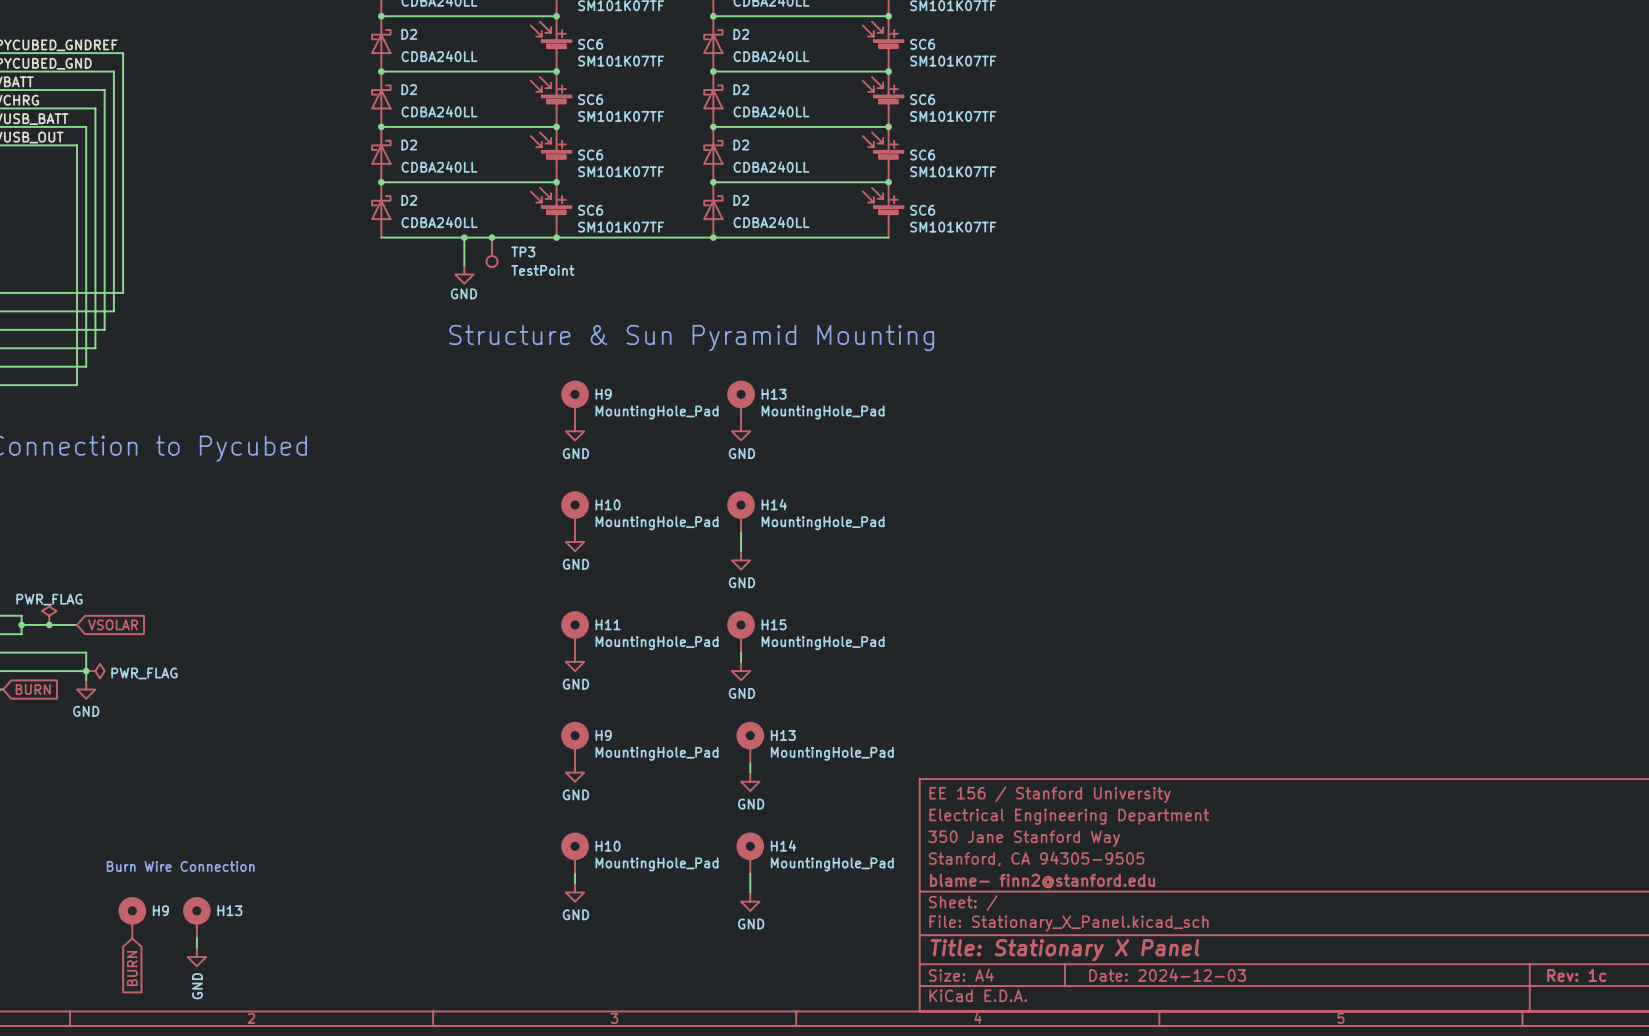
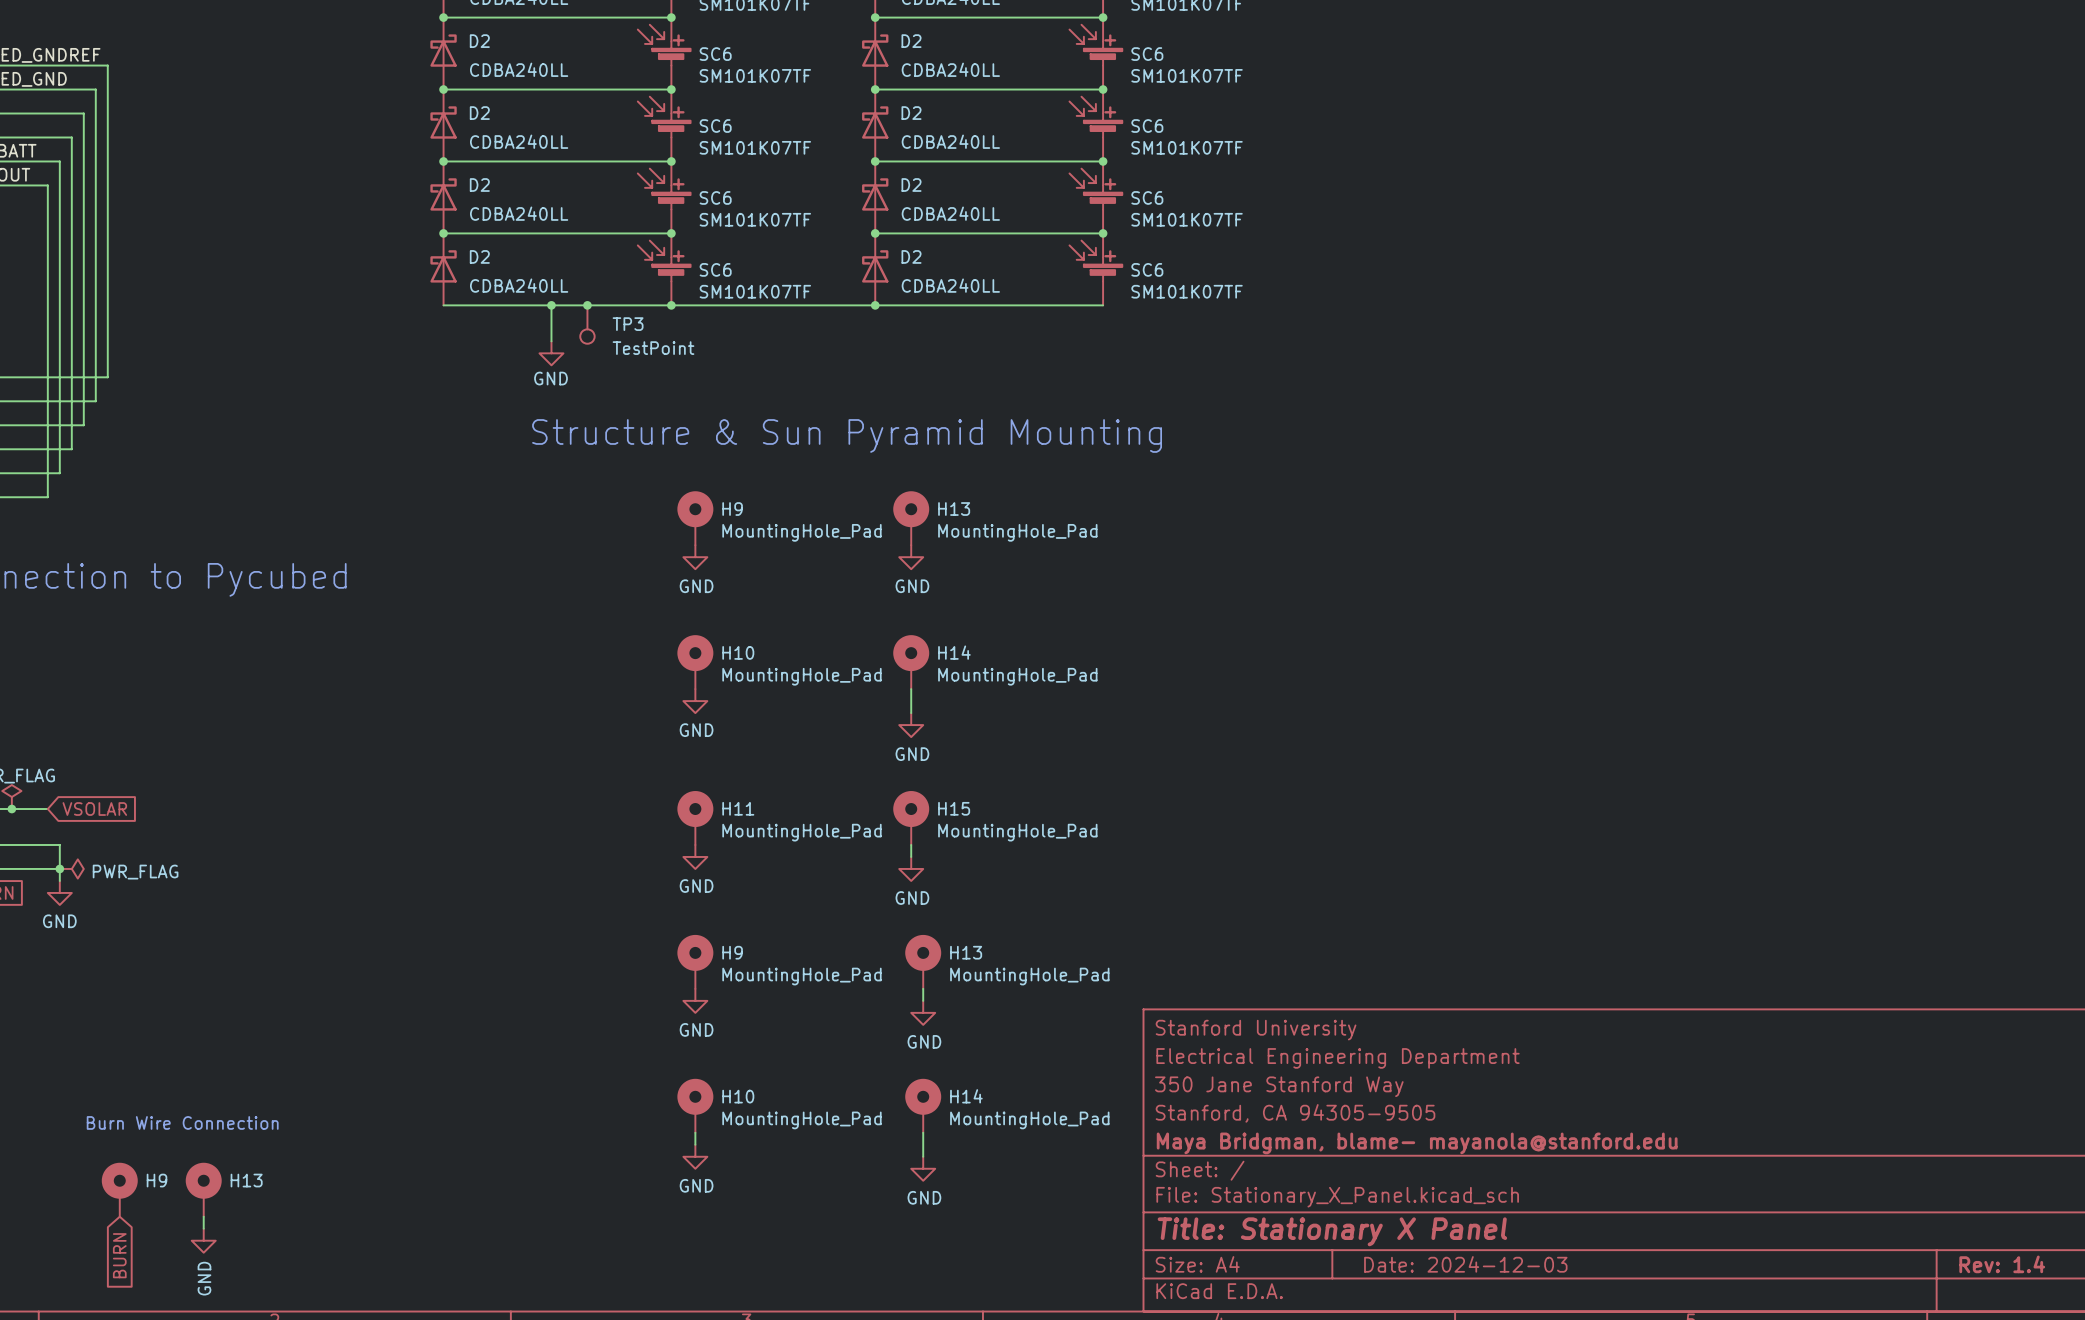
title block: EE 156 / Stanford University (1050, 794) -> Stanford University (1256, 1030)
title block: blame- finn2@stanford.edu (1042, 881) -> Maya Bridgman, blame- mayanola@stanford.edu (1417, 1143)
title block: Rev: 1c (1576, 975) -> Rev: 1.4 (2002, 1264)

